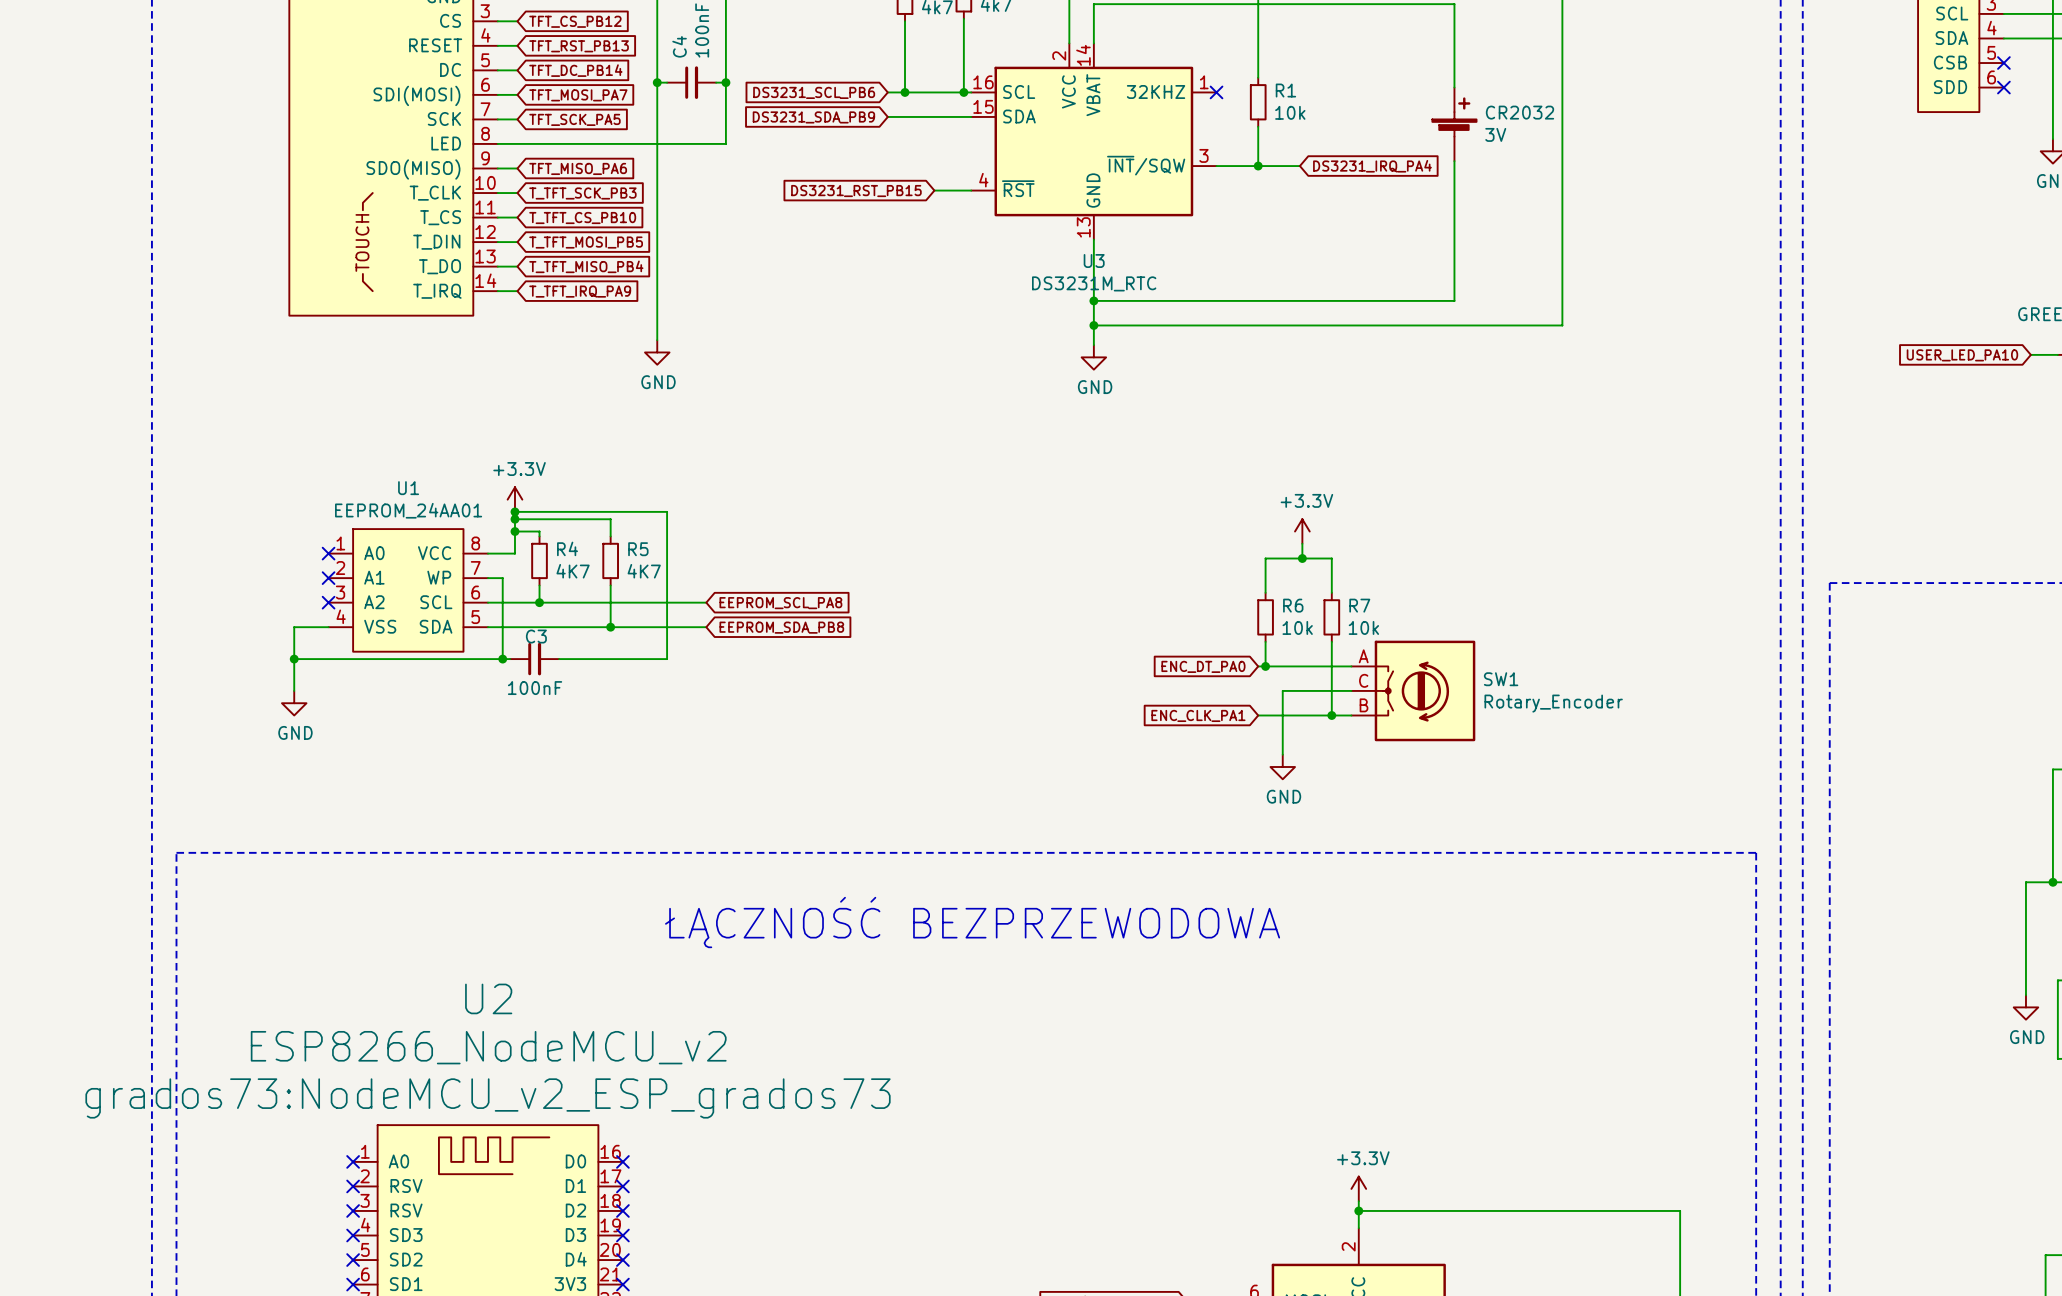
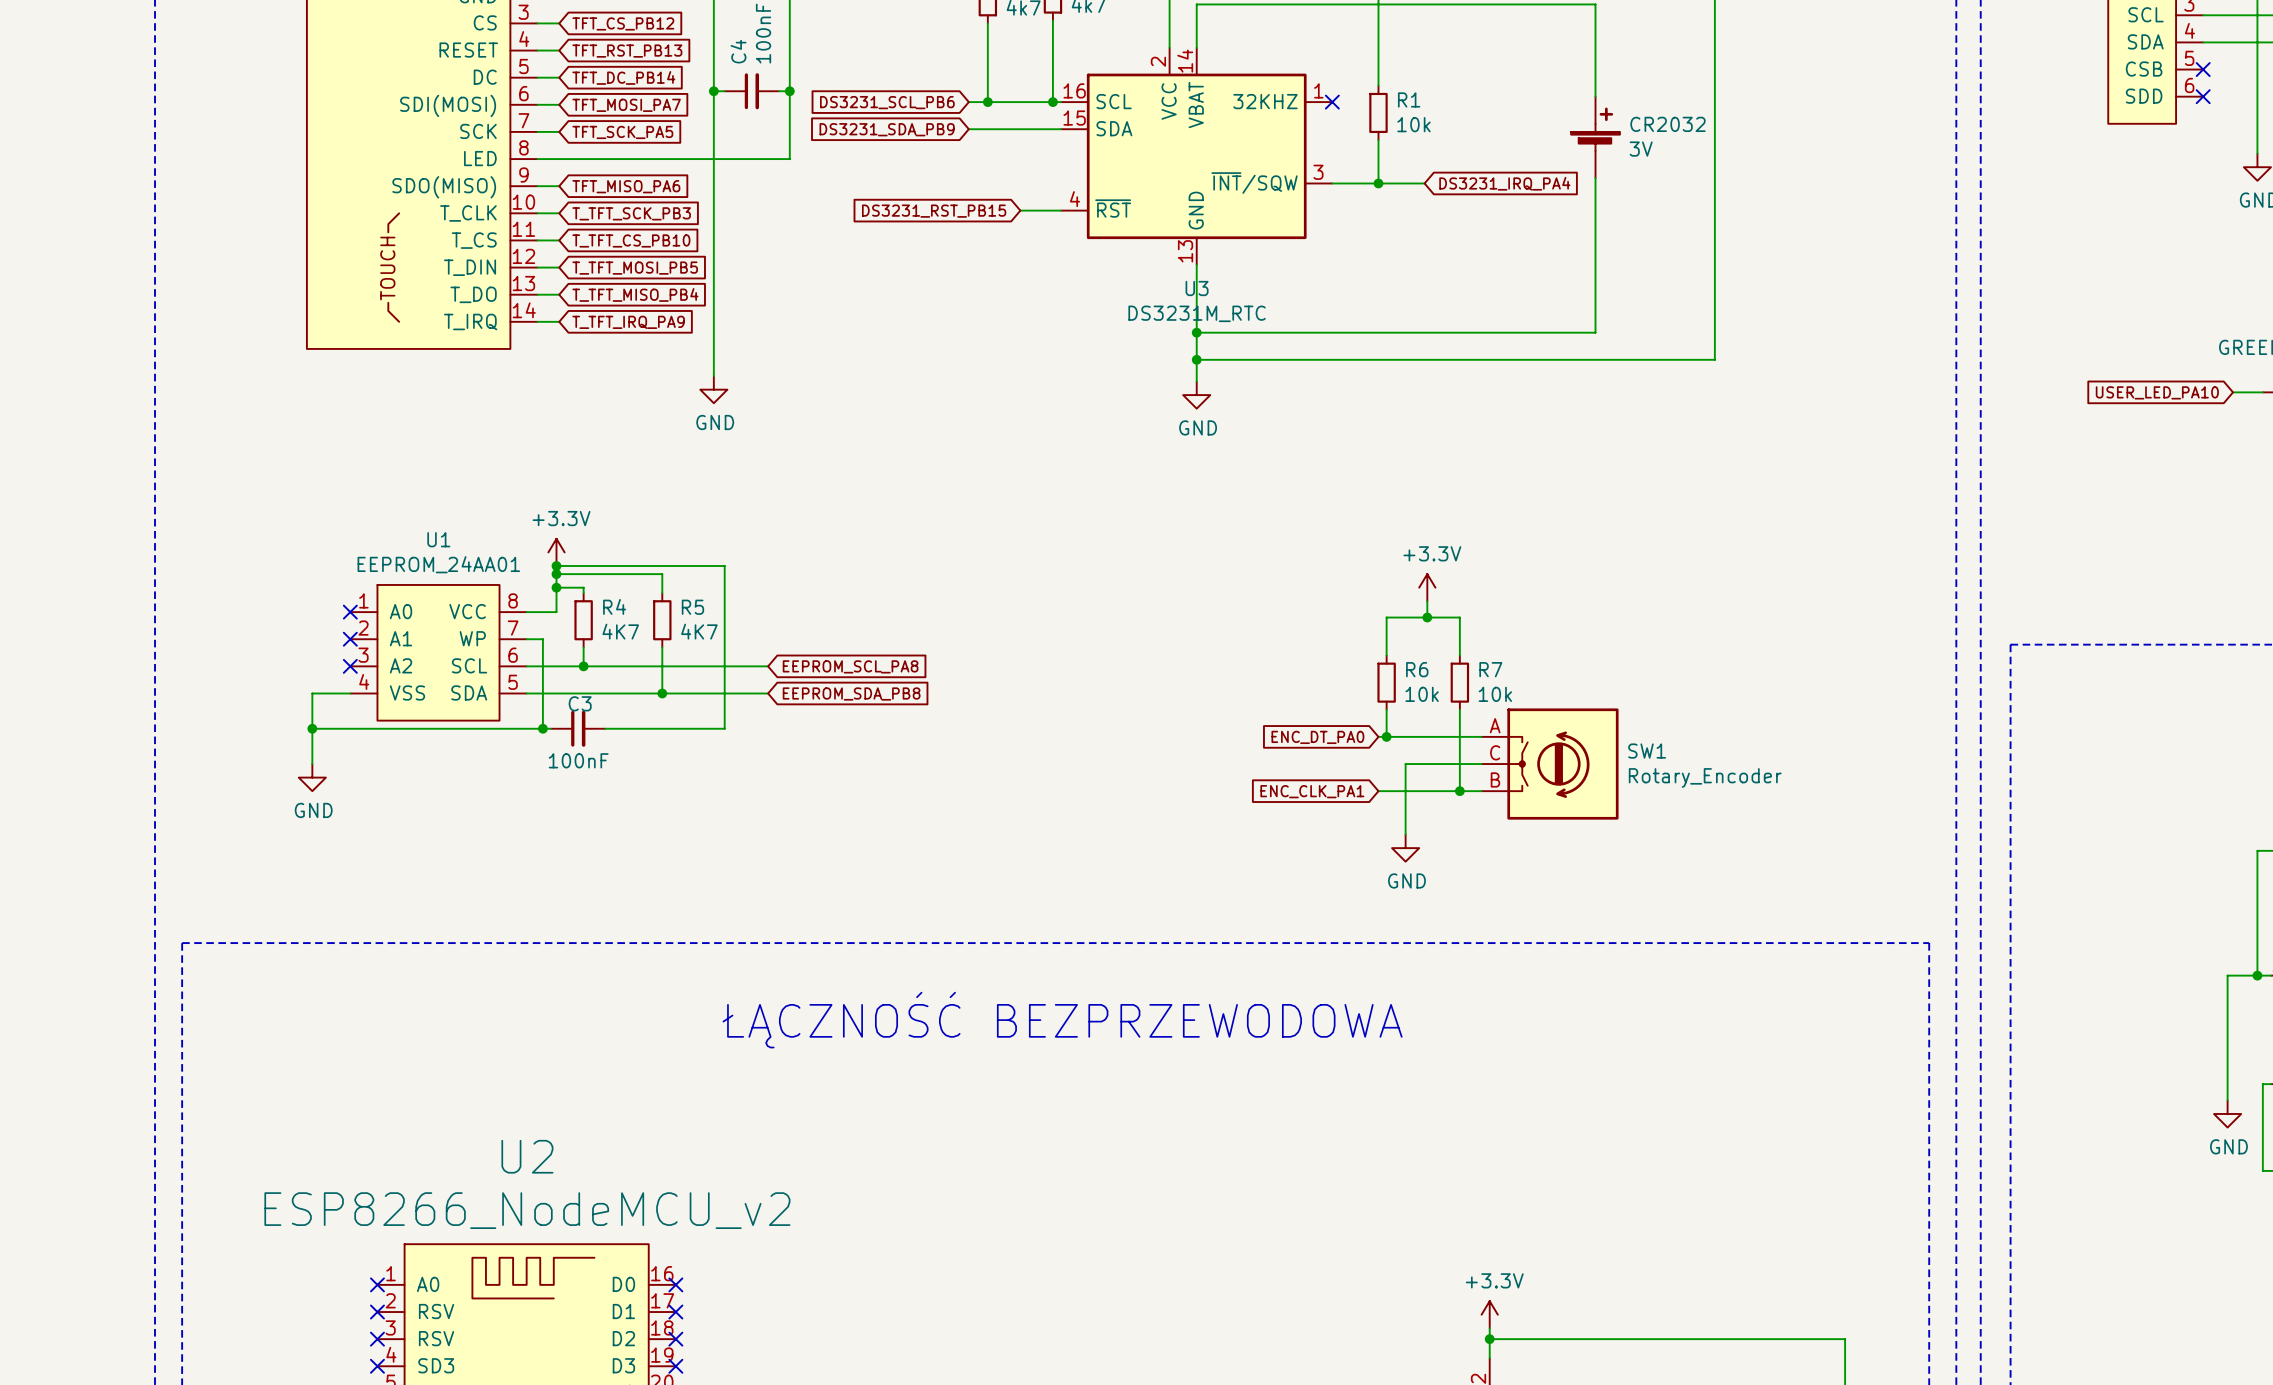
U2 name position: U2 (488, 998) -> U2 (527, 1156)
U2 value position: ESP8266_NodeMCU_v2 (488, 1047) -> ESP8266_NodeMCU_v2 (527, 1210)
U2 text: grados73:NodeMCU_v2_ESP_grados73 (488, 1098) -> none

